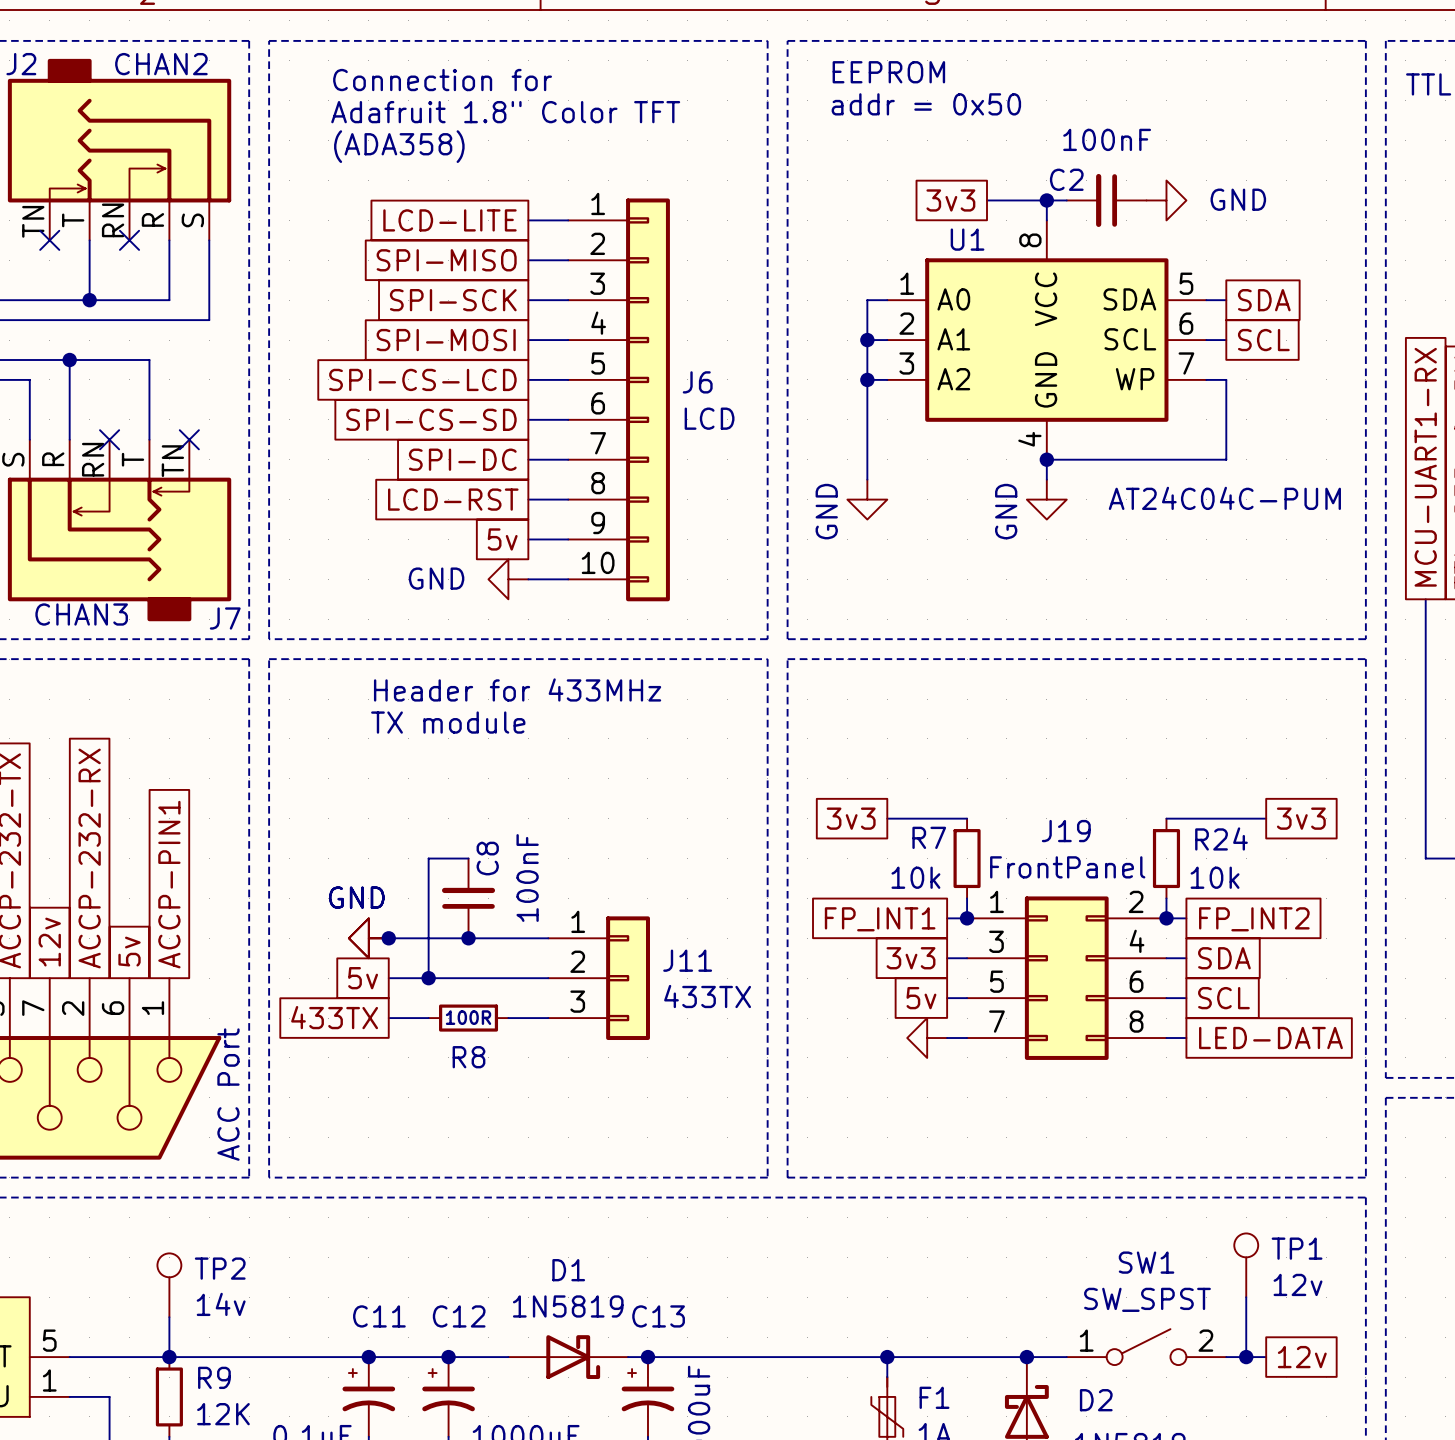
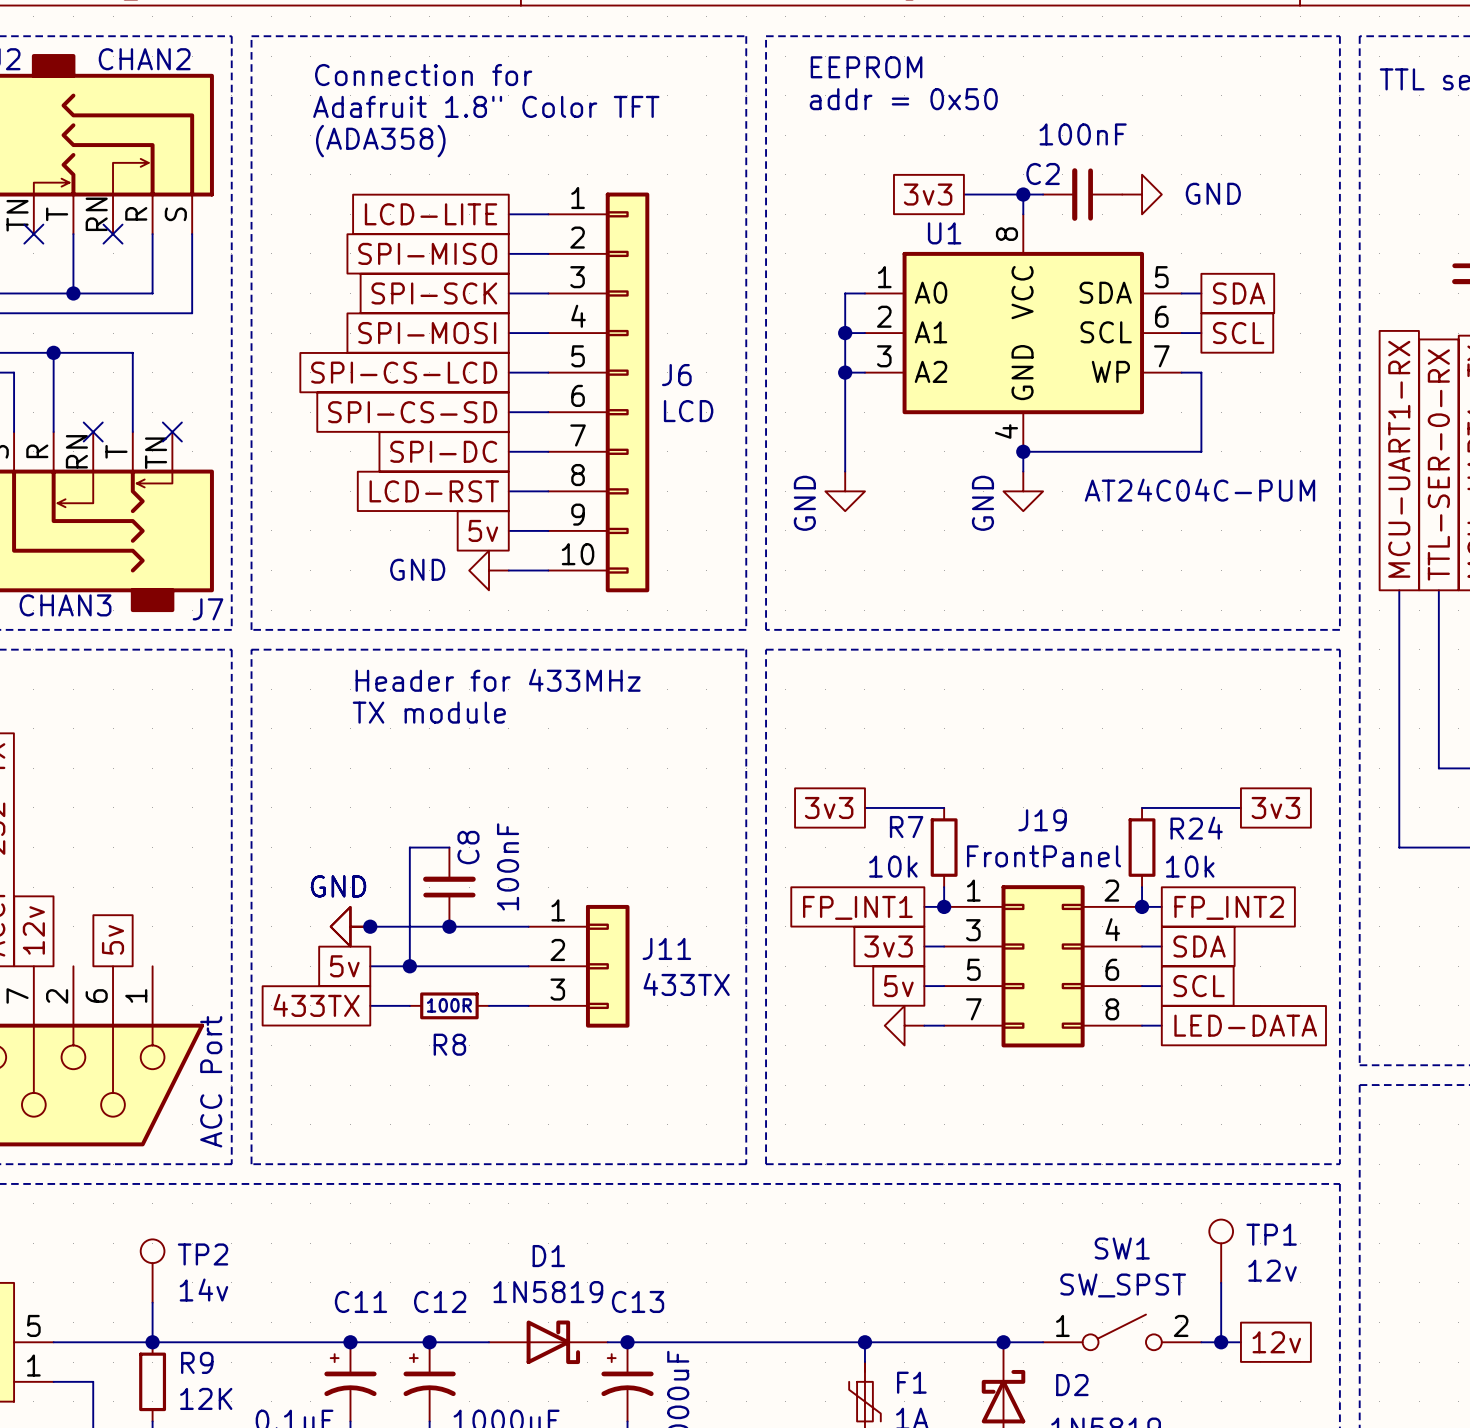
global label: ACCP-232-RX (89, 858) -> none
global label: ACCP-PIN1 (169, 884) -> none

